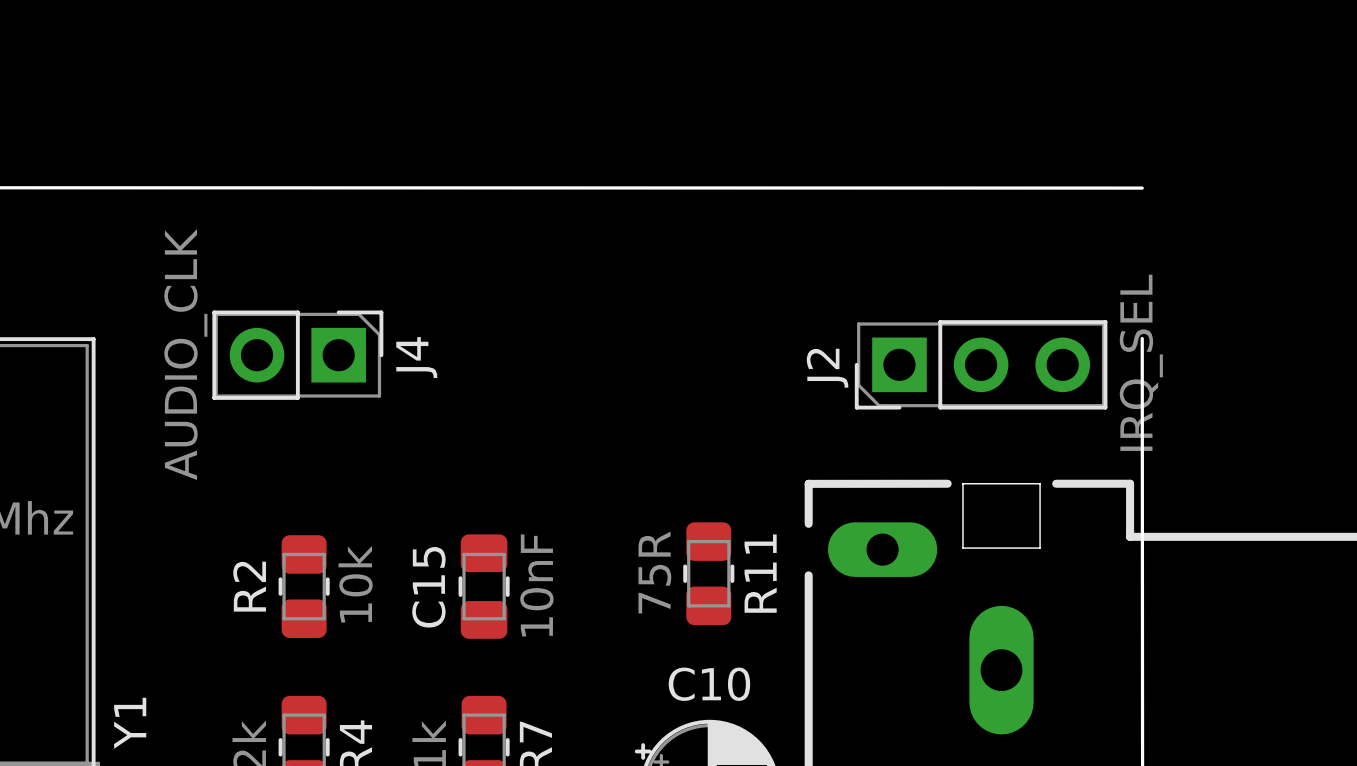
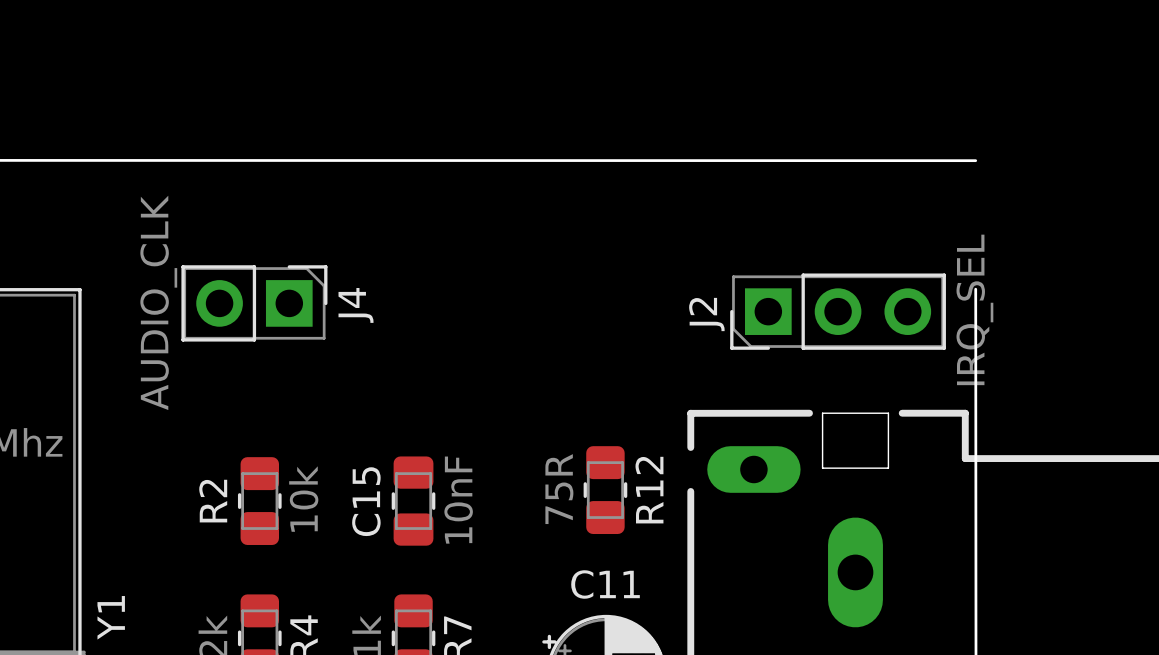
R11 name: R11 (760, 573) -> R12 (649, 490)
C10 name: C10 (709, 684) -> C11 (605, 584)

